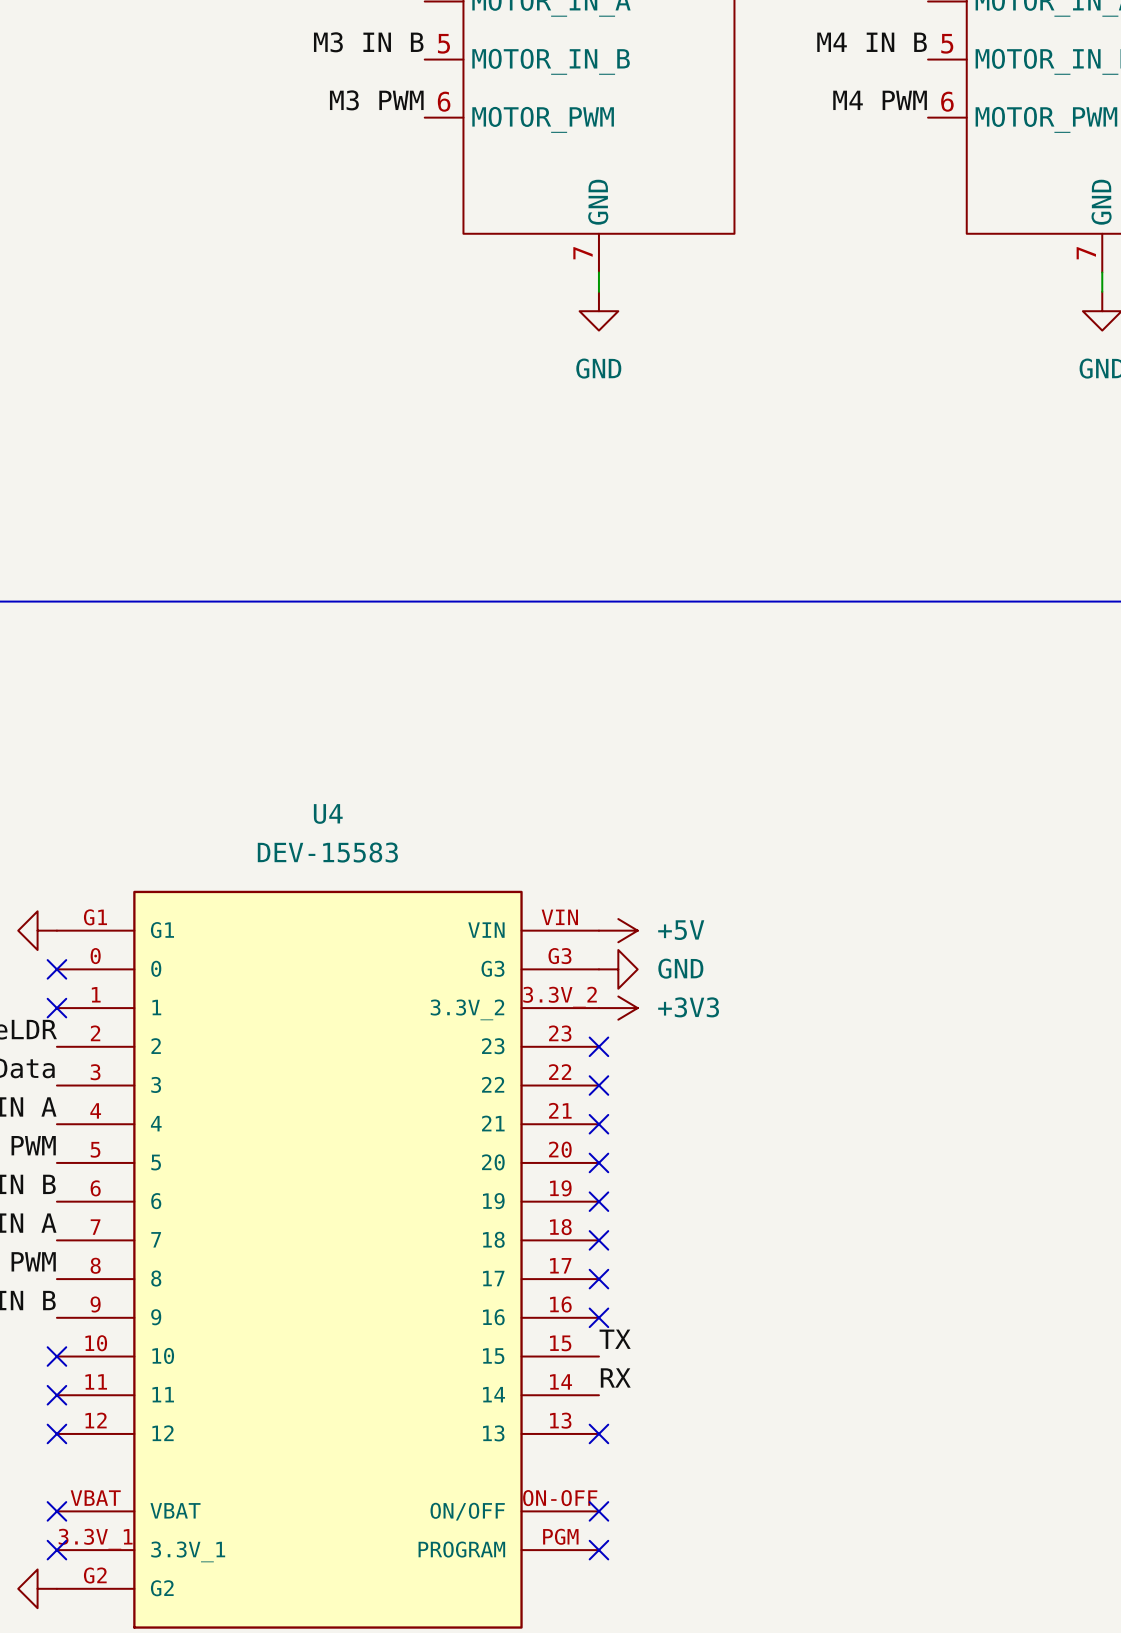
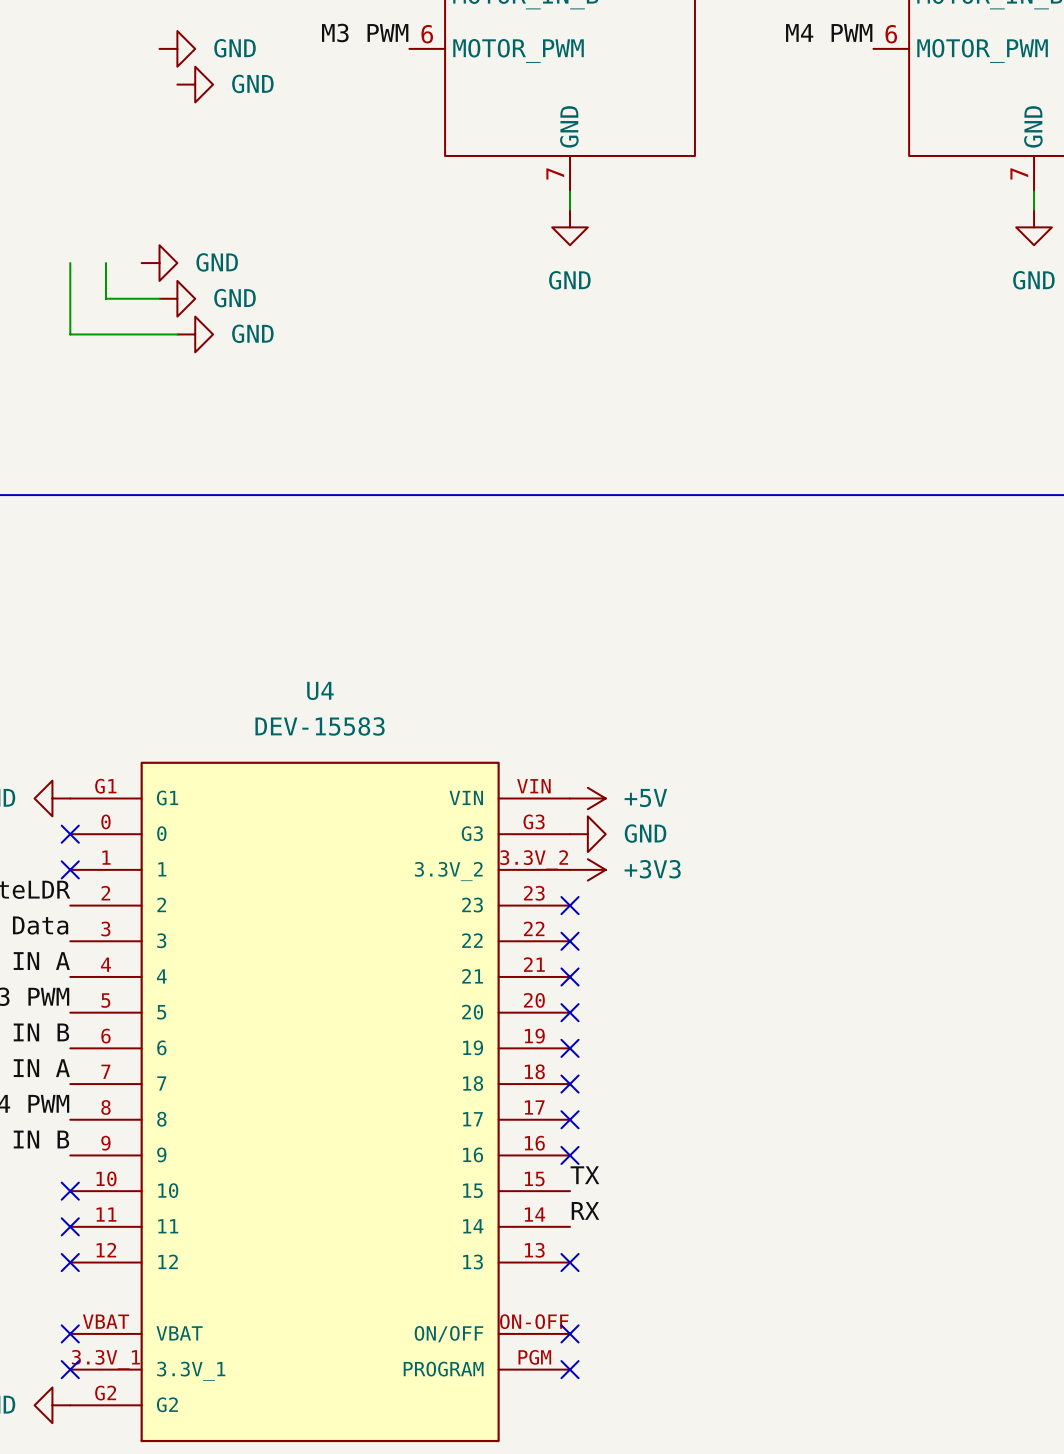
power symbol: none -> GND (177, 48)
power symbol: none -> GND (195, 84)
wire: none -> (70, 263) (70, 334) (177, 334)
wire: none -> (105, 263) (105, 298) (159, 298)
power symbol: none -> GND (159, 263)
power symbol: none -> GND (177, 298)
power symbol: none -> GND (195, 334)

